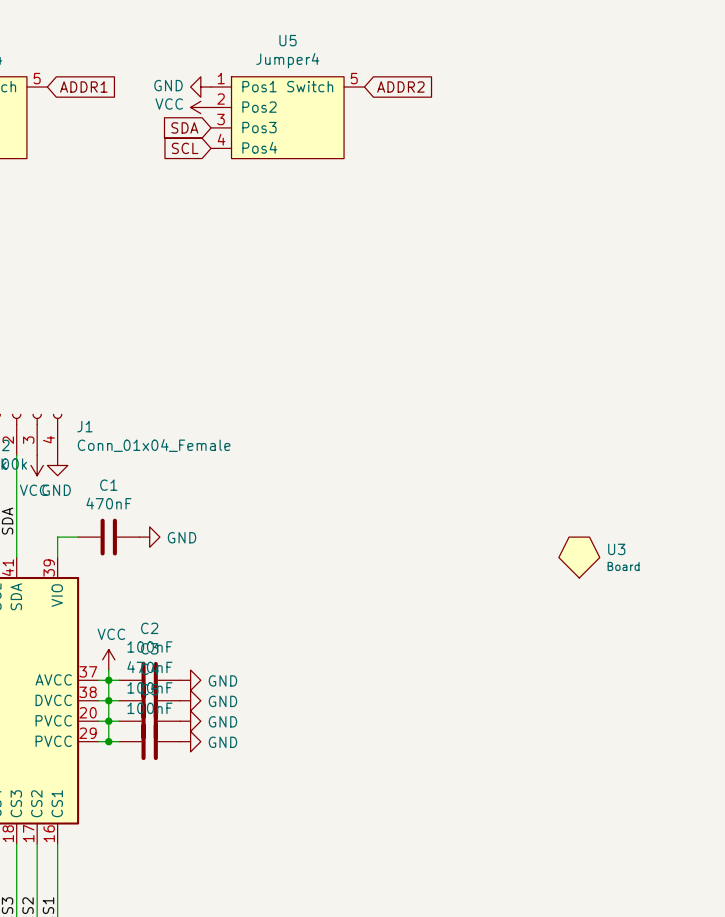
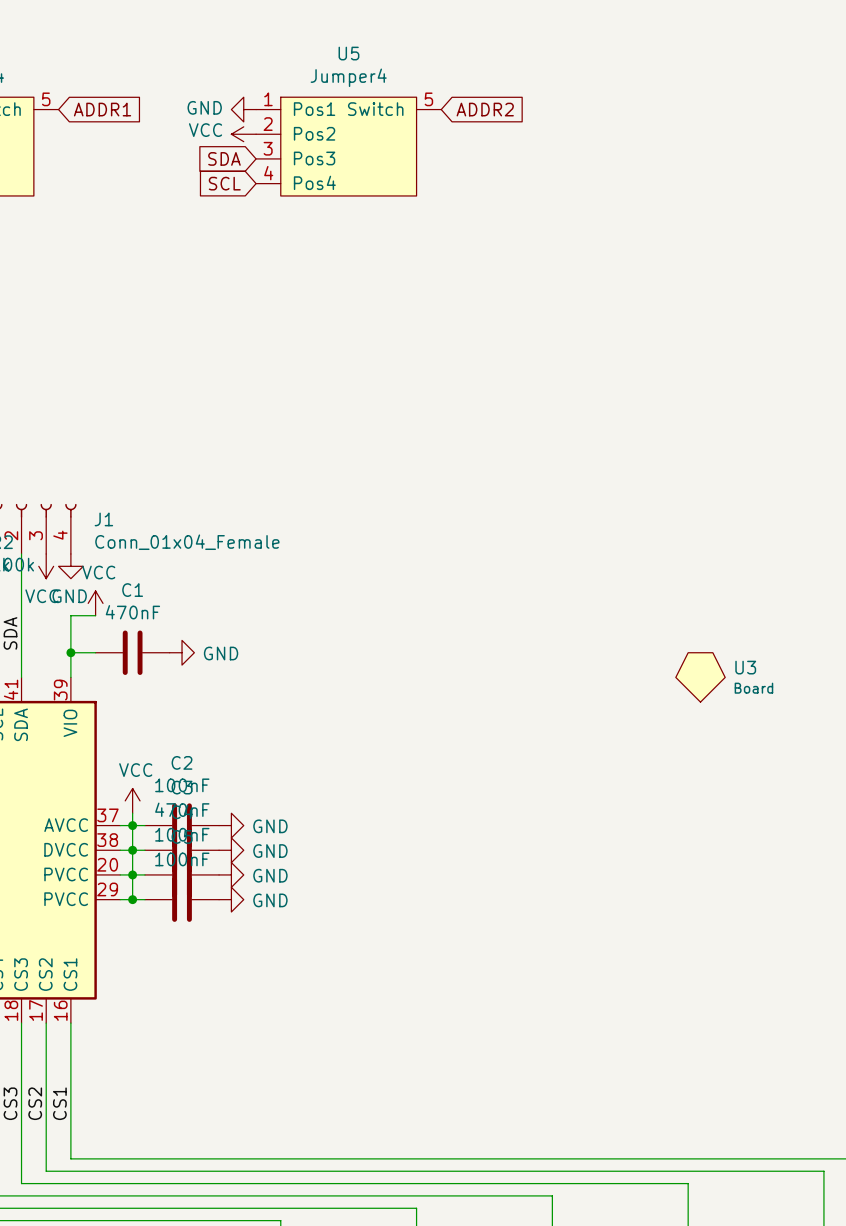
power symbol: none -> VCC (95, 603)
wire: none -> (95, 615) (70, 615) (70, 652)
junction: none -> (70, 652)

